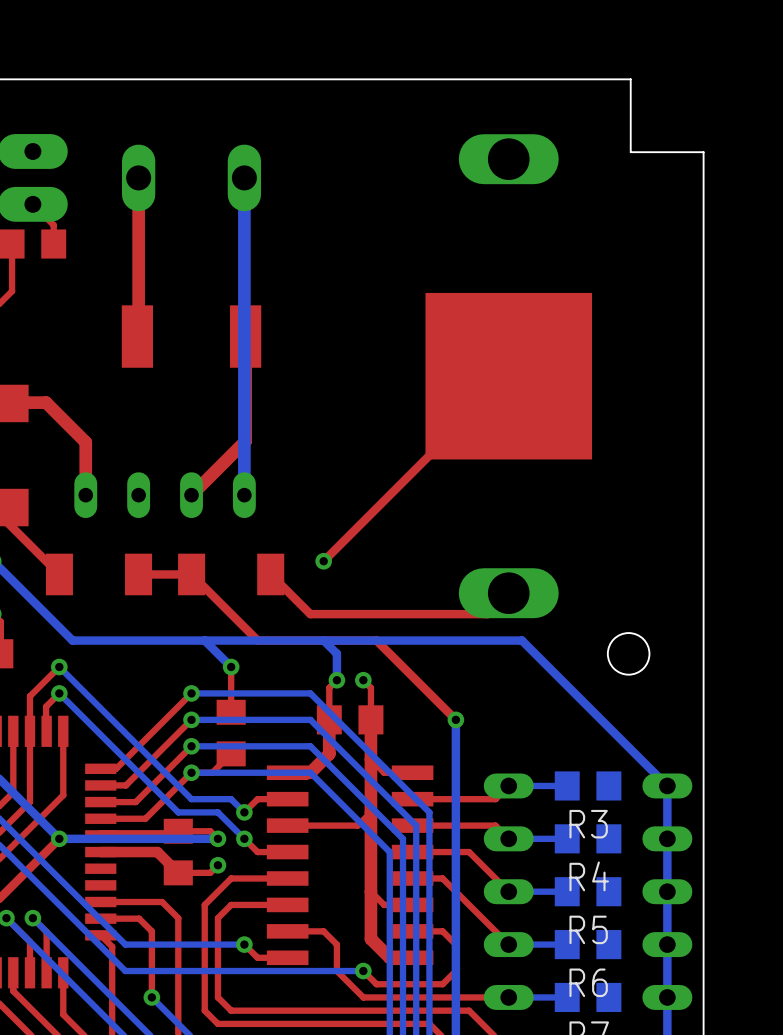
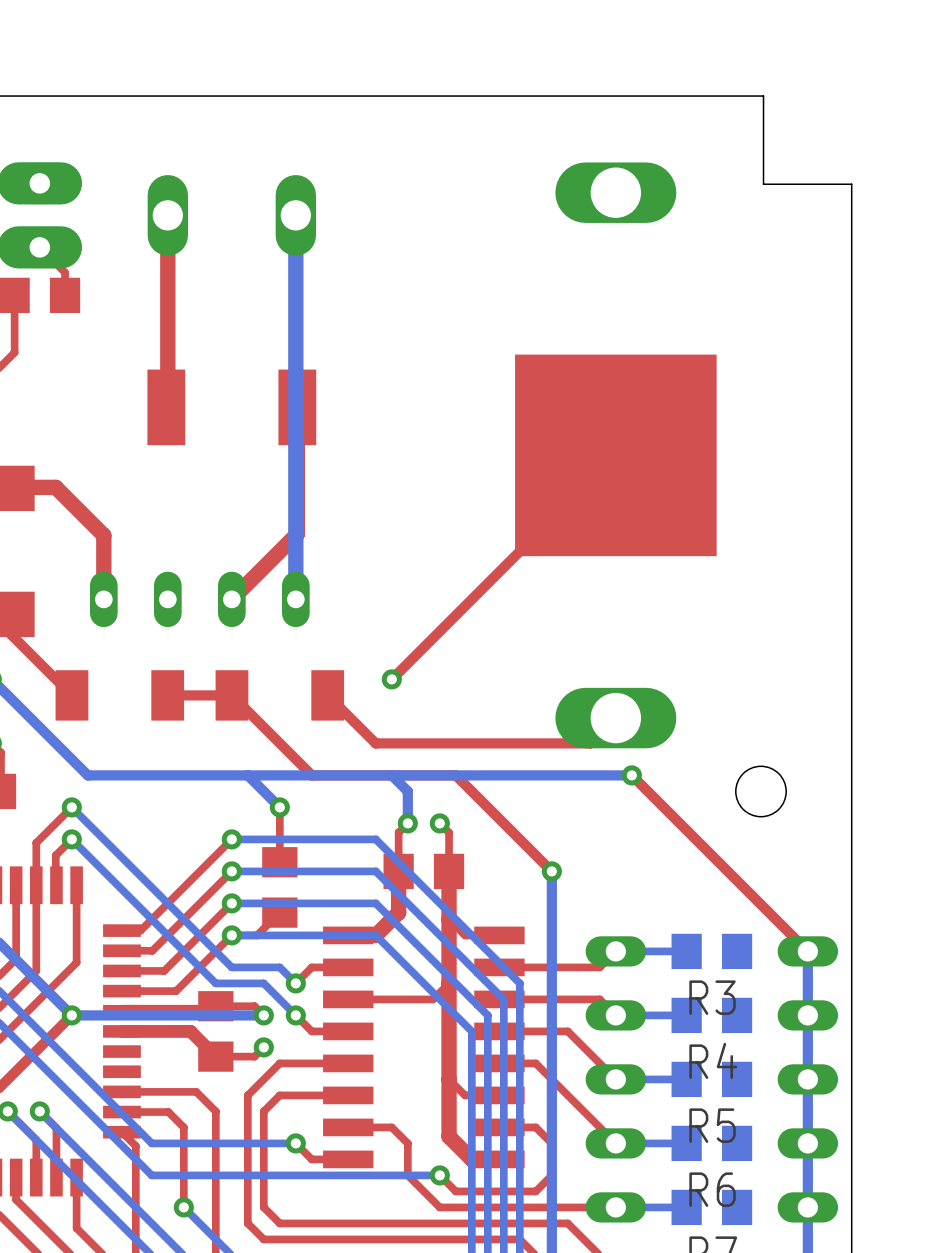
top track: none -> (631, 775) (807, 951)
bottom track: (521, 640) (667, 785) -> none
via: none -> (631, 775)

